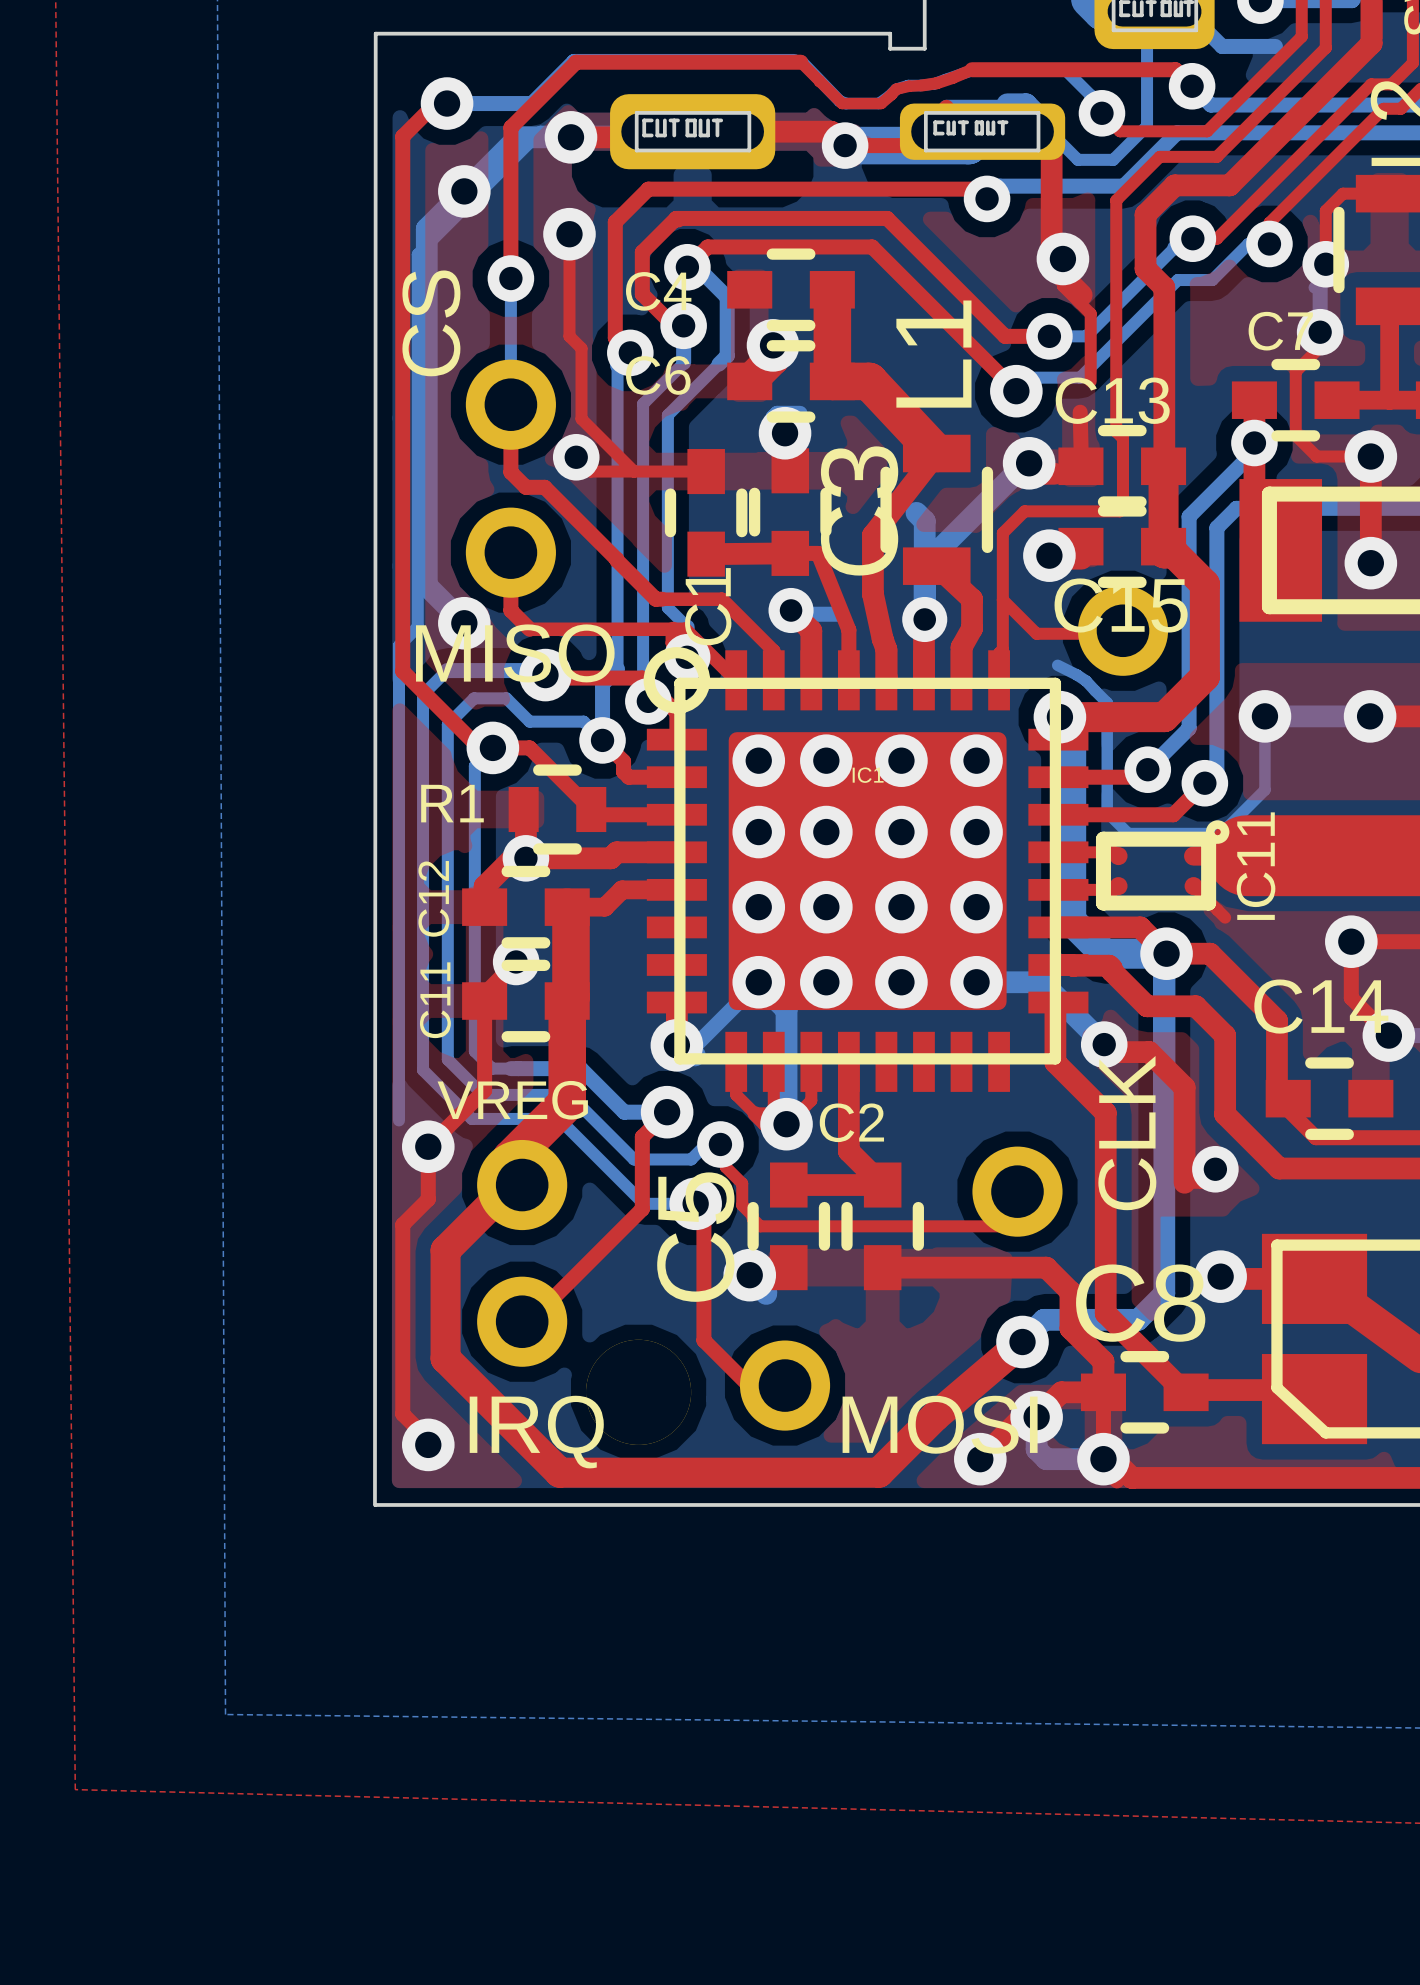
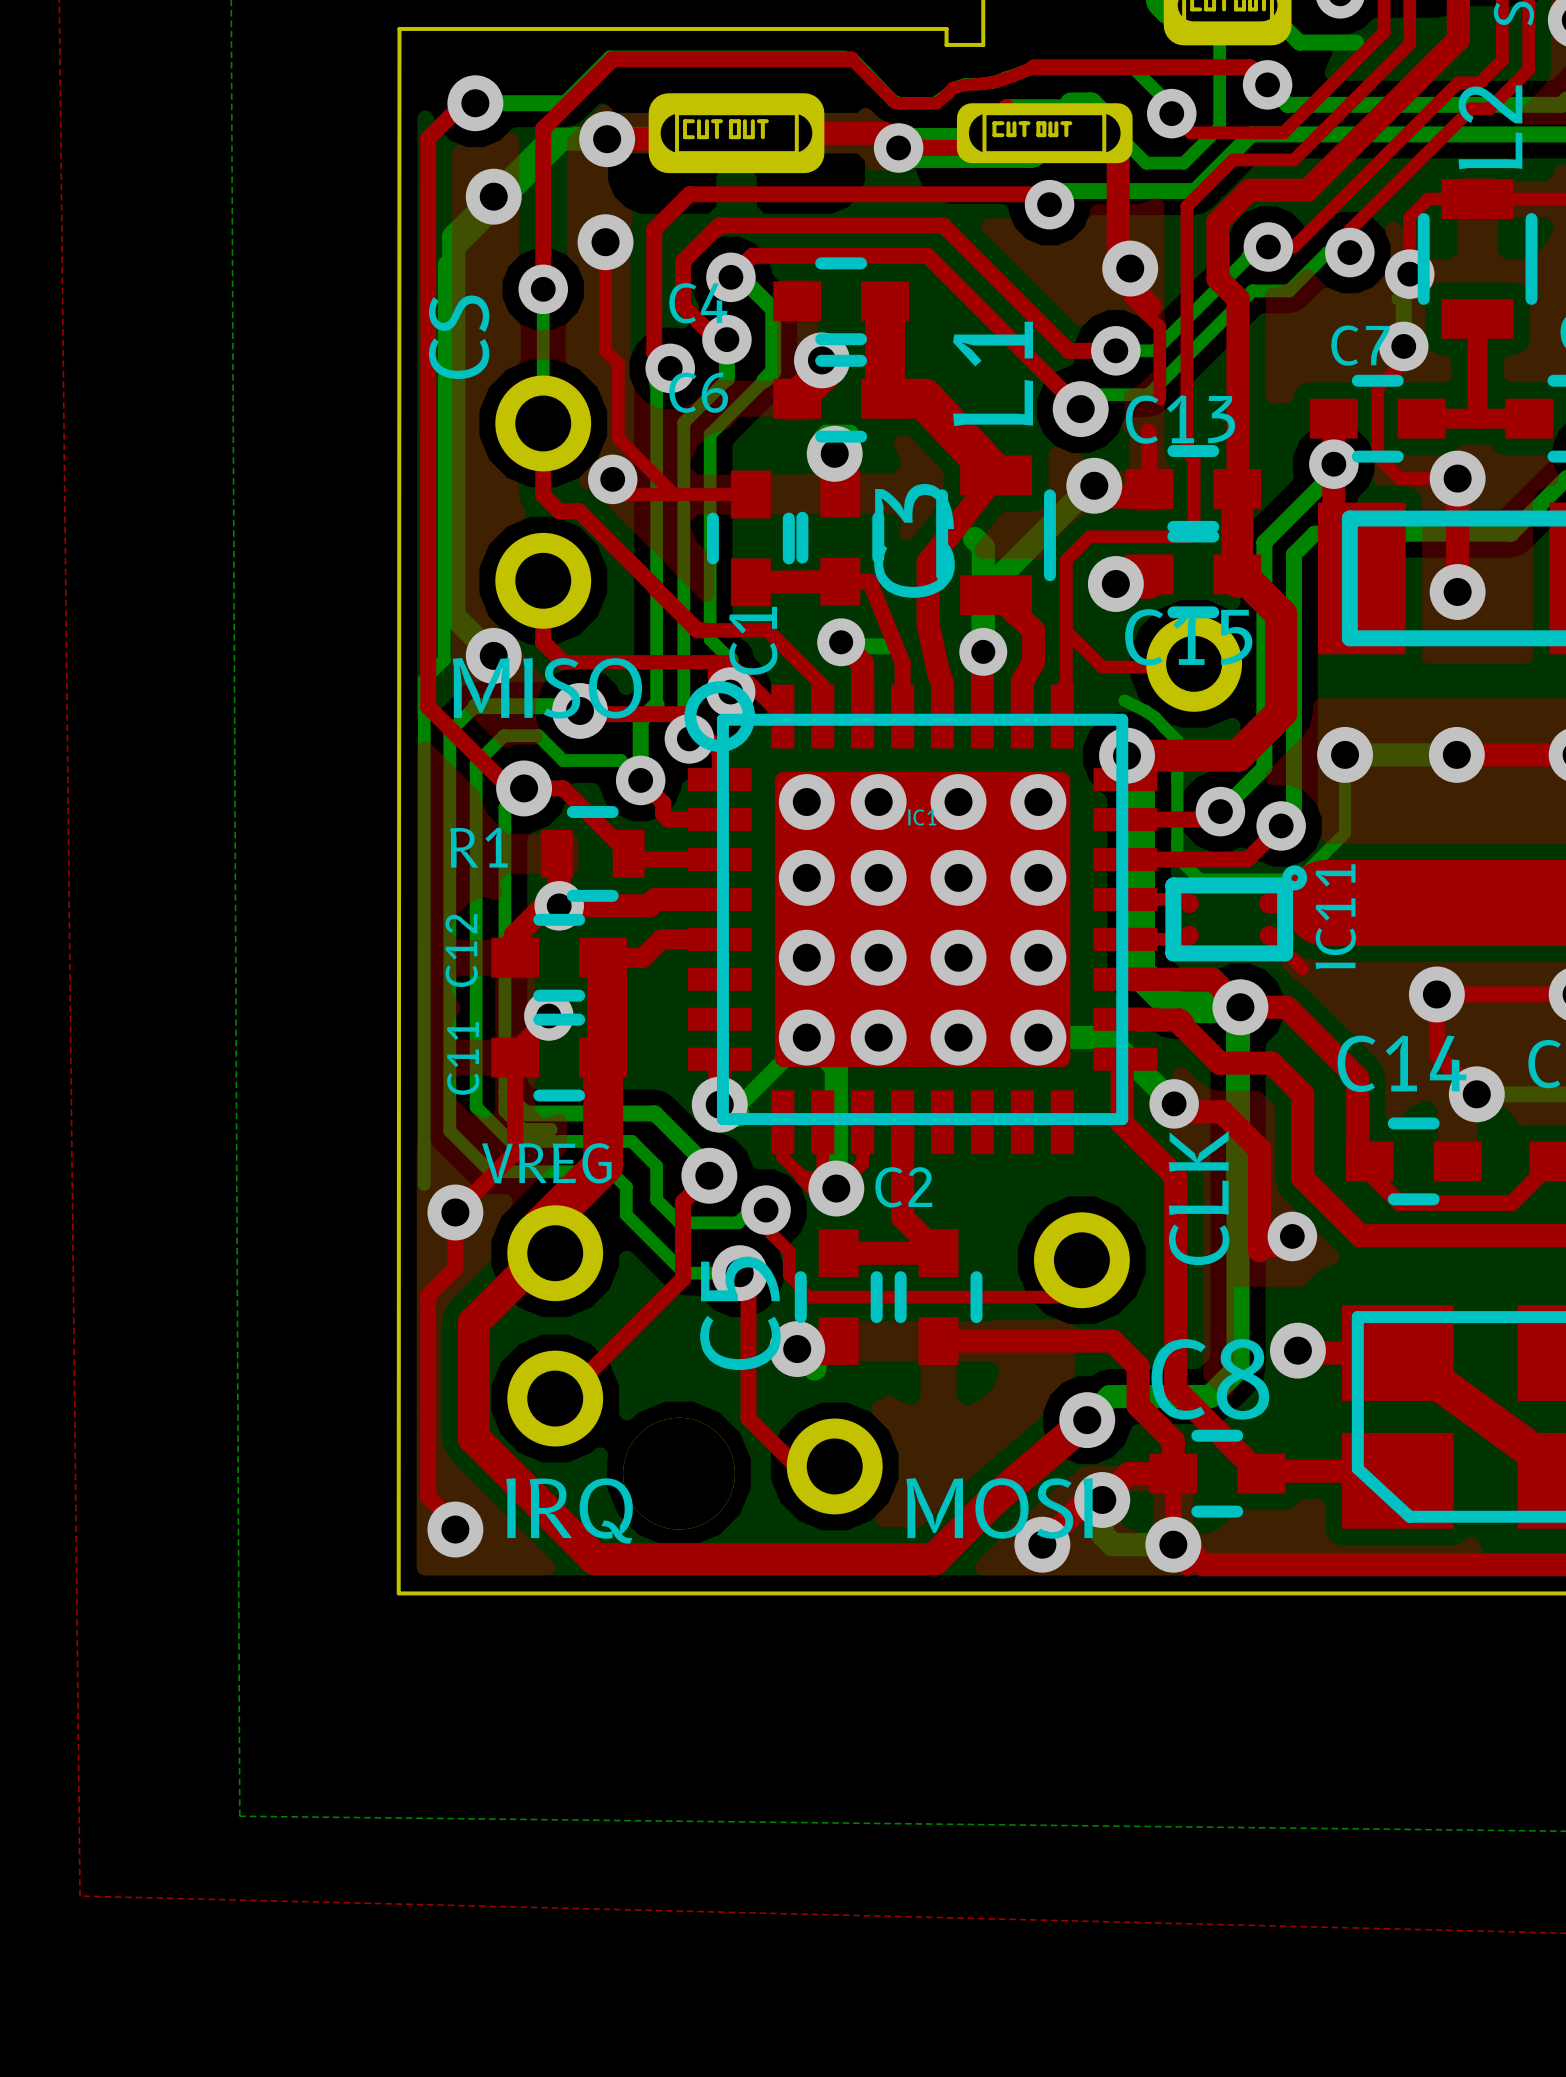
bottom track: (447, 1047) (447, 1059) (483, 1094) (569, 1094) (634, 1159) (691, 1159) (694, 1156) -> (476, 1107) (510, 1141) (631, 1141) (656, 1166) (656, 1199) (679, 1222) (738, 1222)
bottom track: (510, 1068) (580, 1068) (624, 1112) (667, 1112) -> (504, 1091) (527, 1113) (655, 1113) (709, 1167) (709, 1175)
bottom track: (461, 1108) (471, 1118) (558, 1118) (589, 1148) -> (490, 1171) (611, 1171) (626, 1186) (626, 1214)

